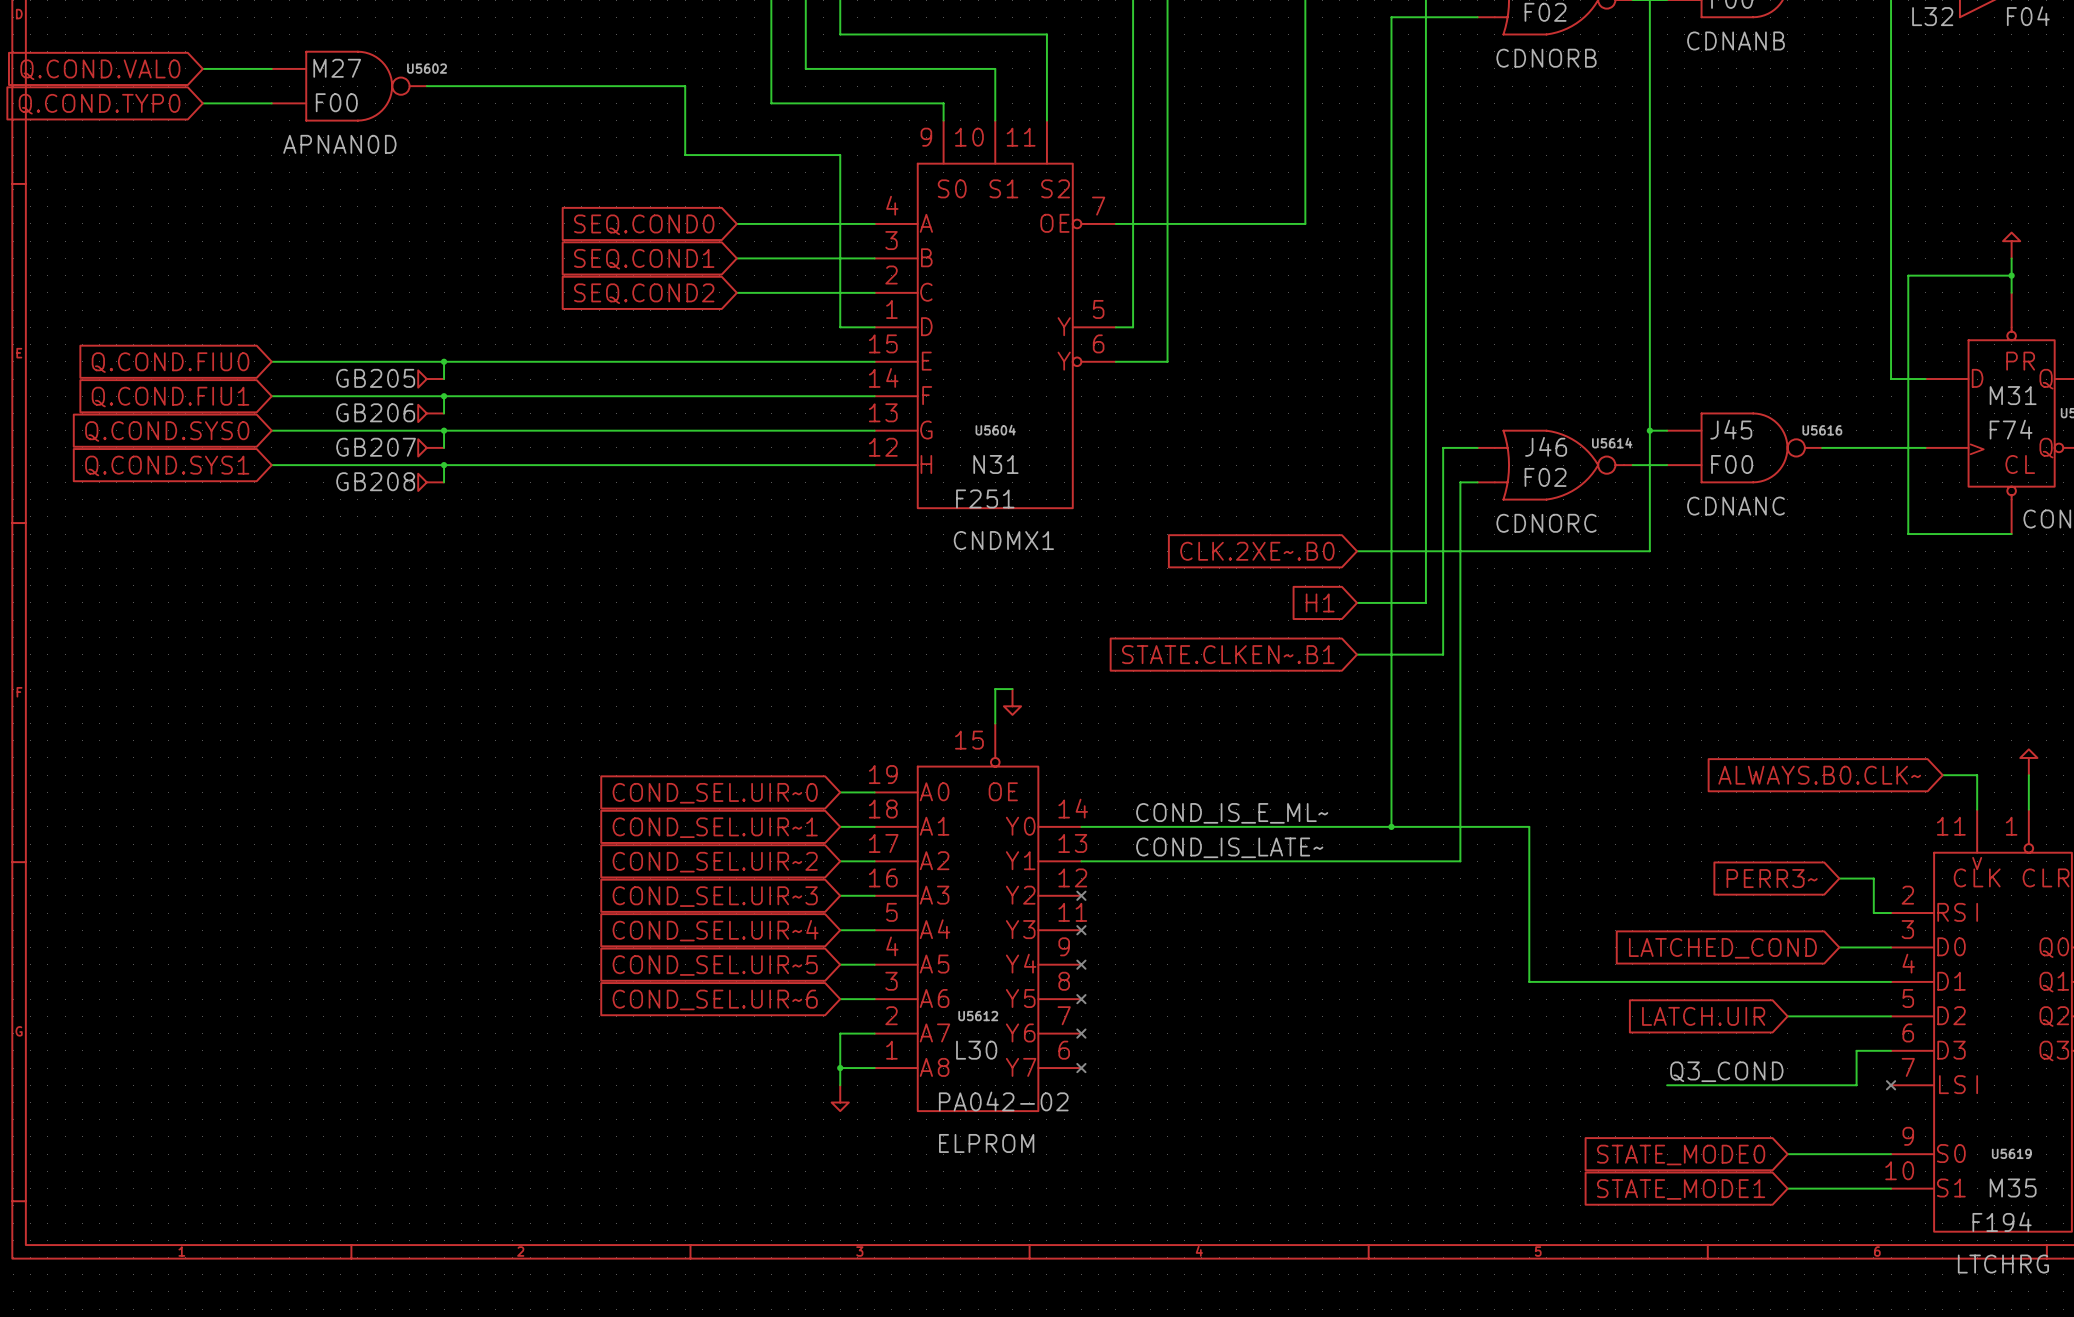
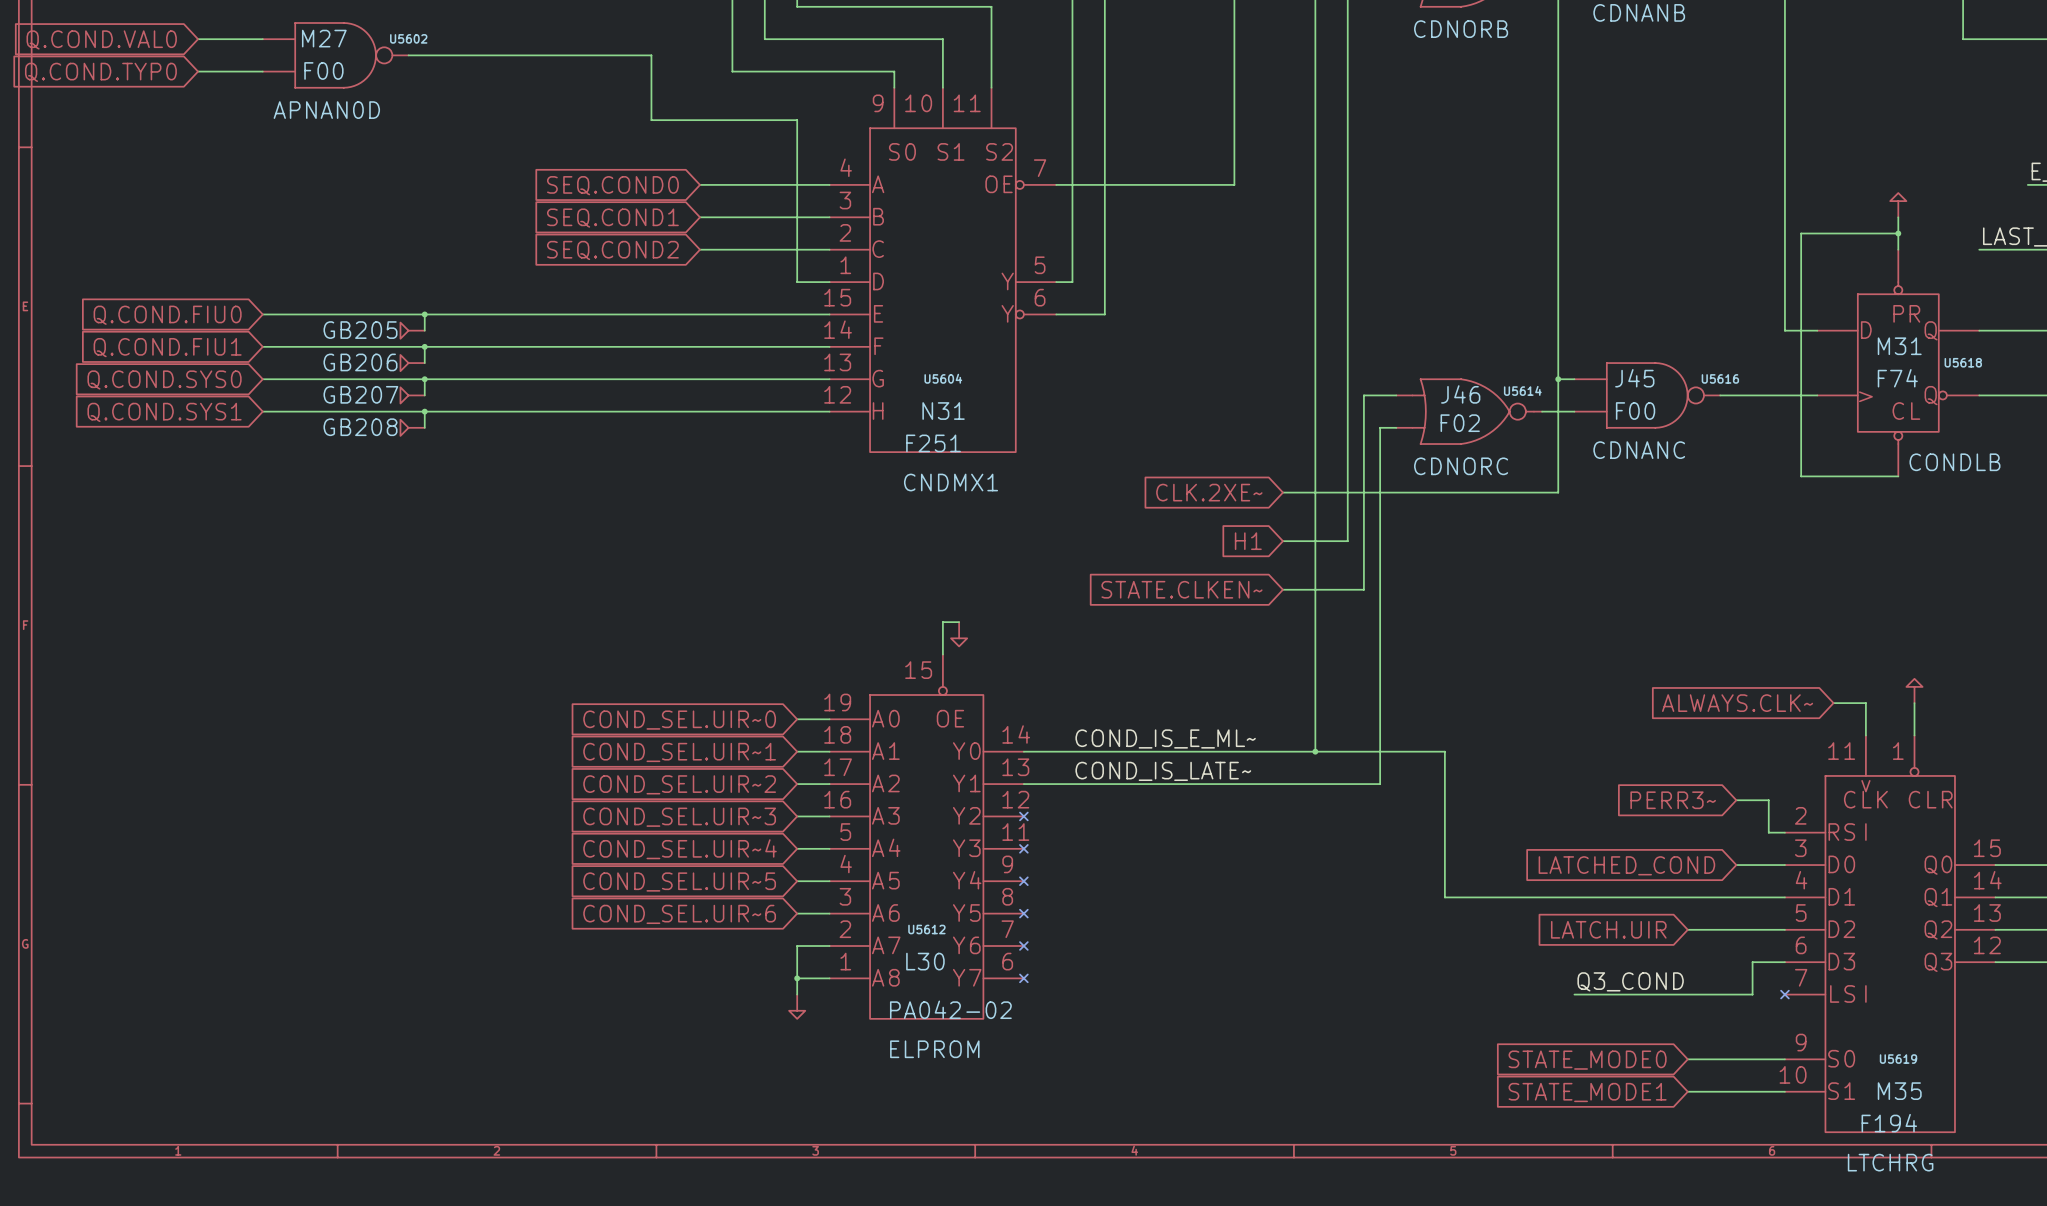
global label: CLK.2XE~.B0 (1257, 551) -> CLK.2XE~ (1209, 492)
global label: STATE.CLKEN~.B1 (1228, 654) -> STATE.CLKEN~ (1181, 589)
global label: ALWAYS.B0.CLK~ (1819, 775) -> ALWAYS.CLK~ (1737, 703)

